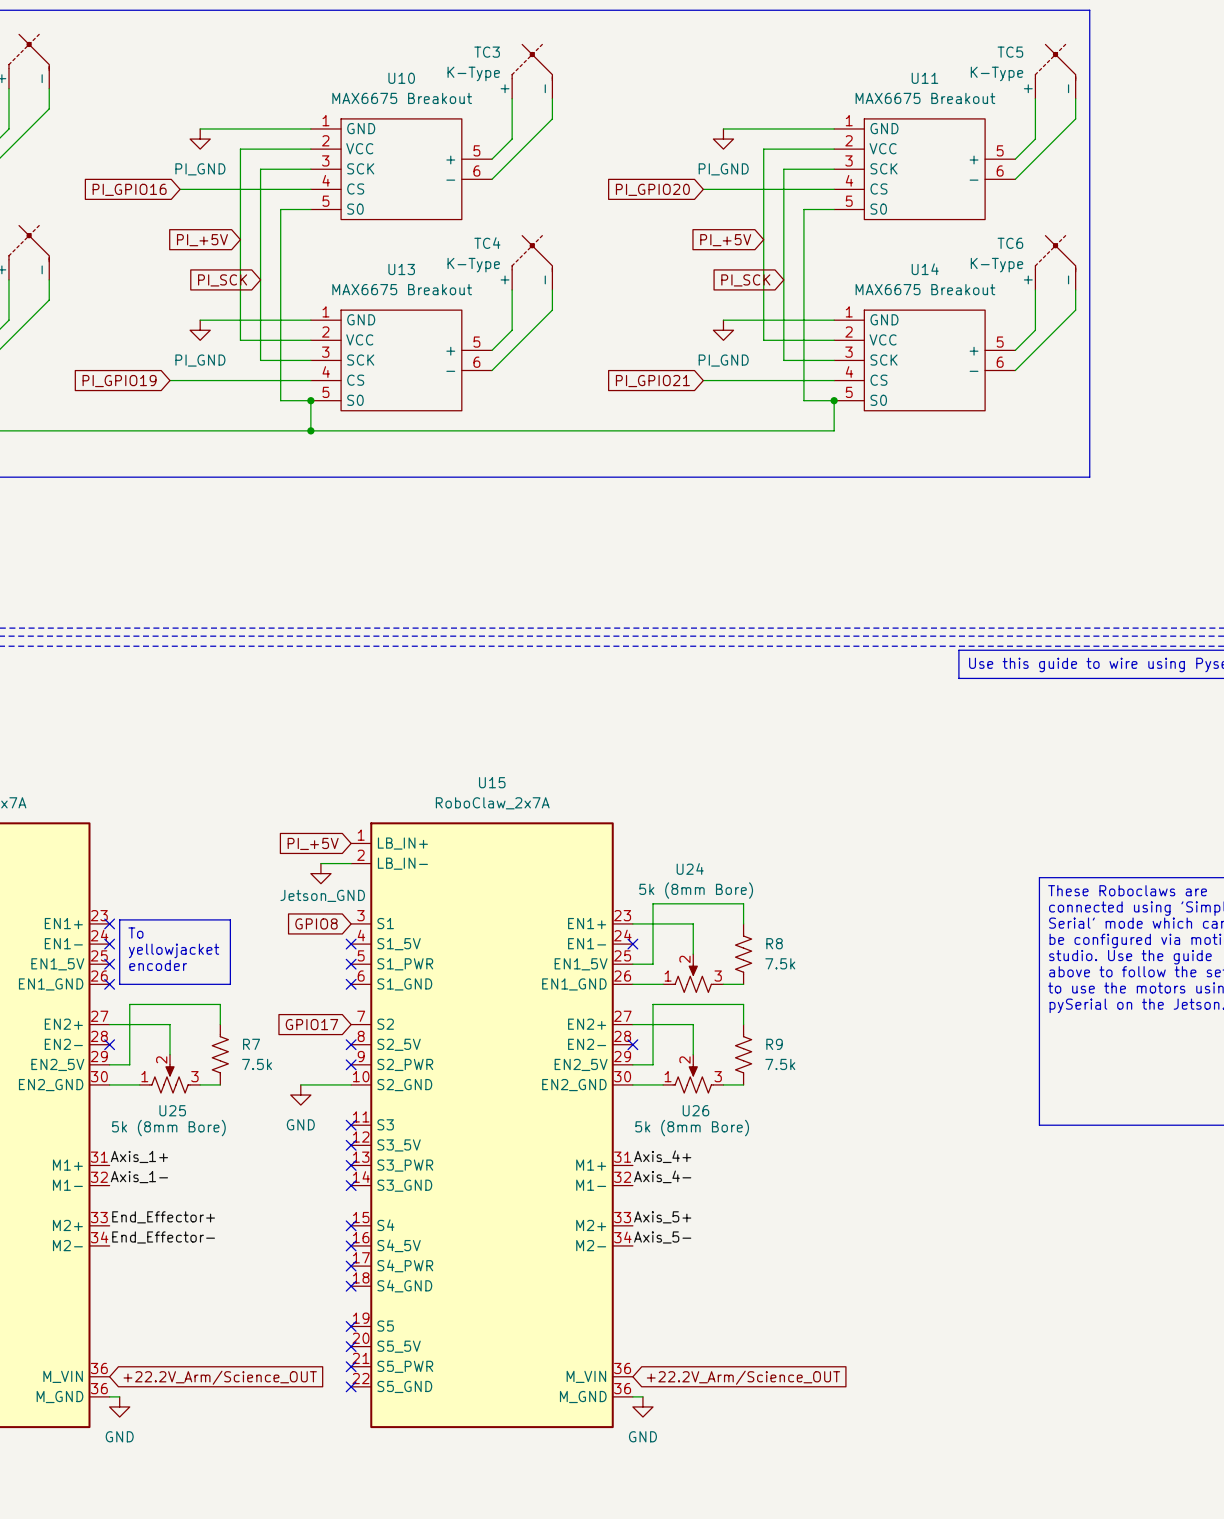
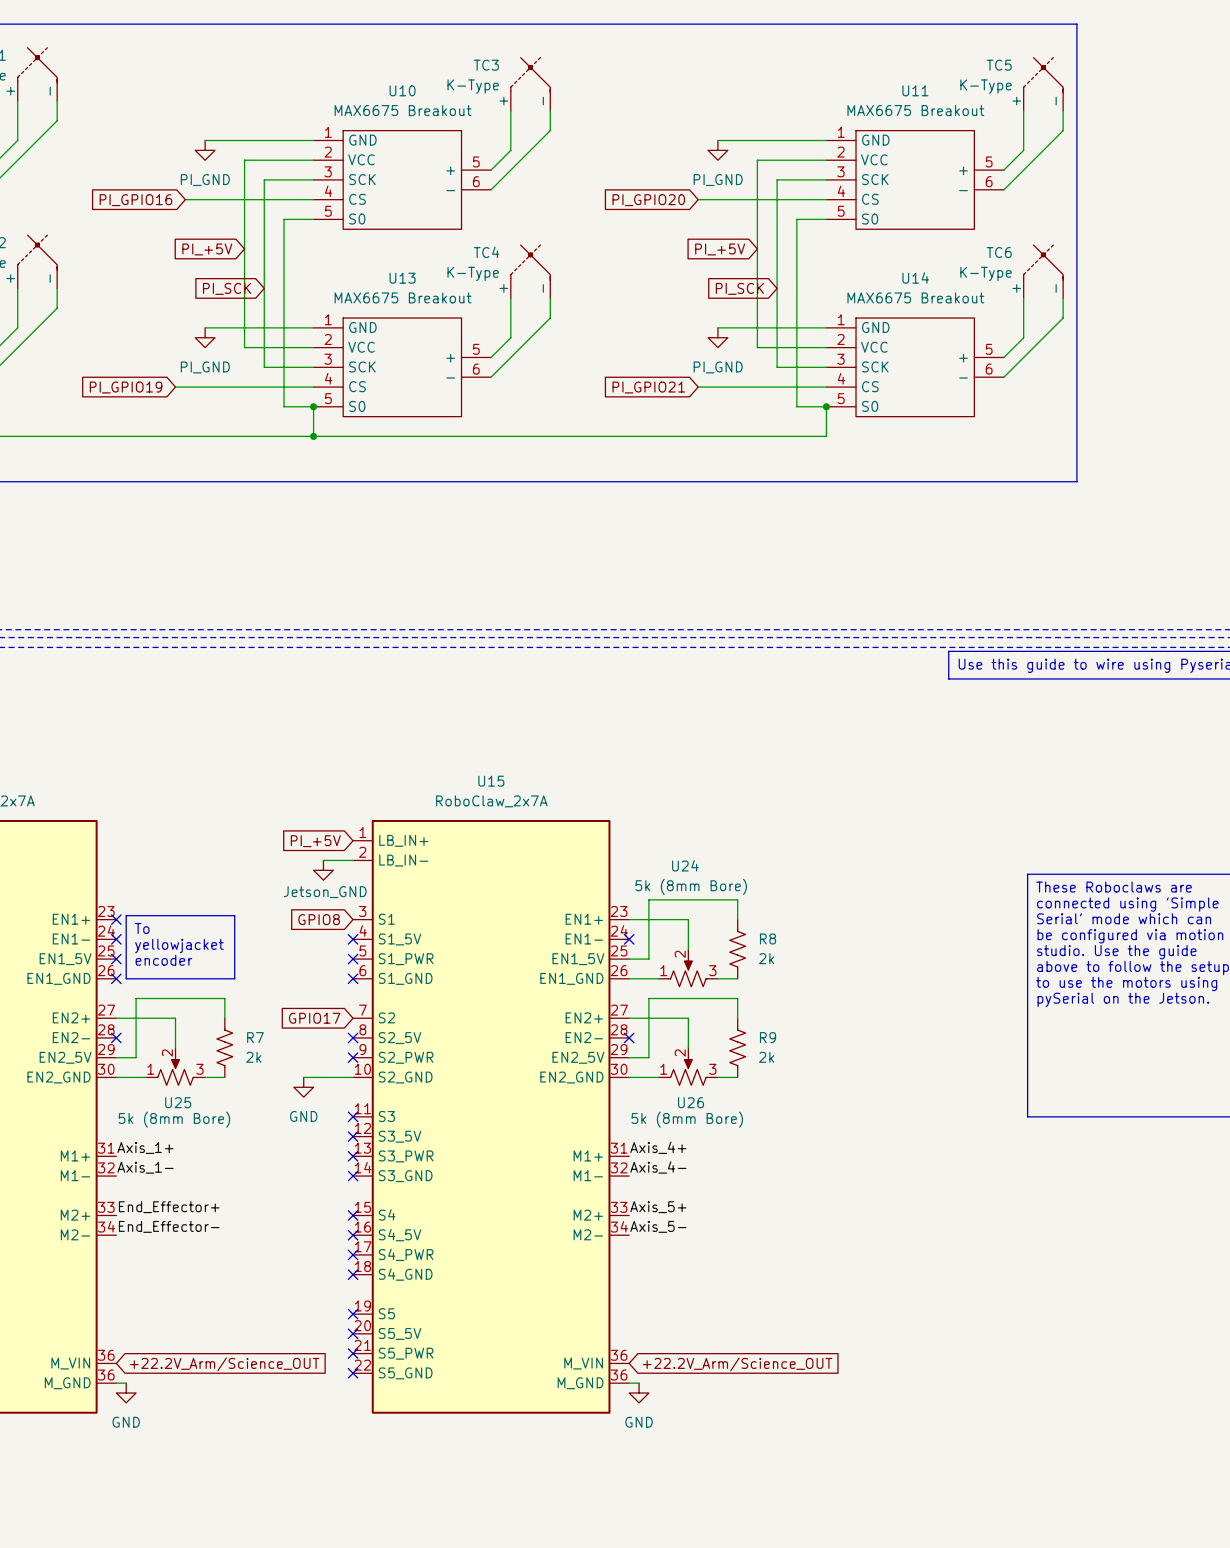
R8 value: 7.5k (780, 963) -> 2k (766, 958)
R7 value: 7.5k (257, 1064) -> 2k (253, 1057)
R9 value: 7.5k (780, 1064) -> 2k (766, 1057)

